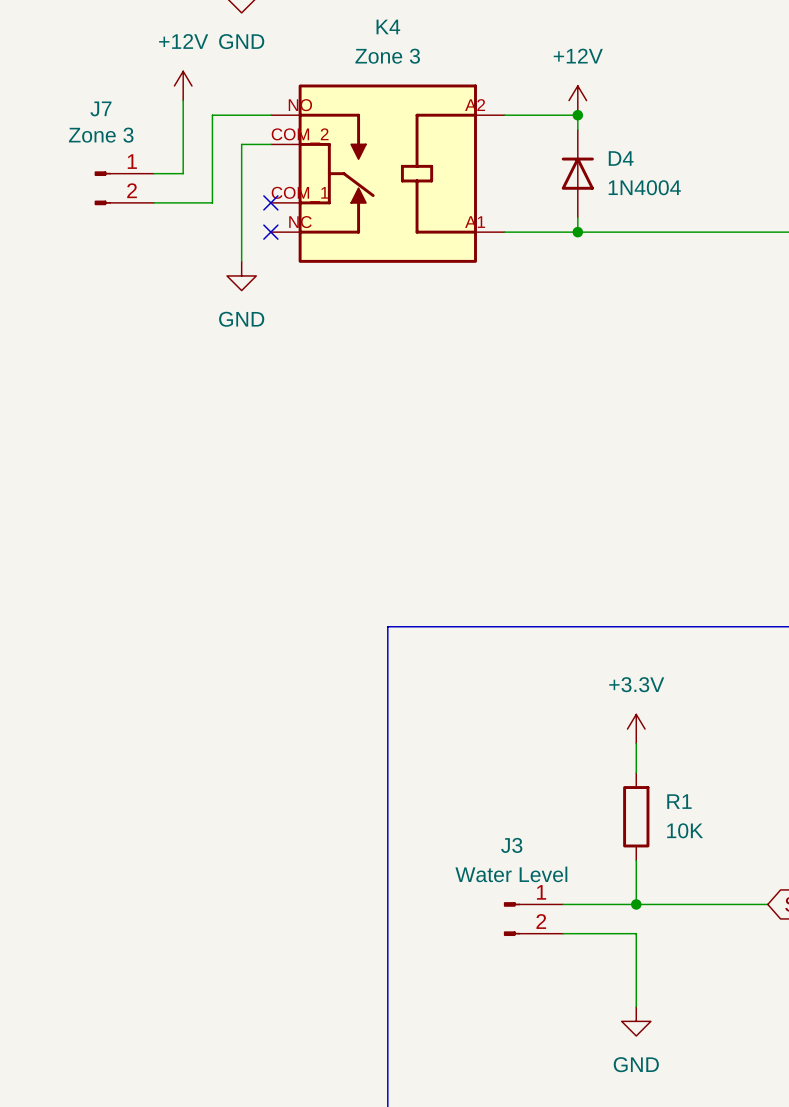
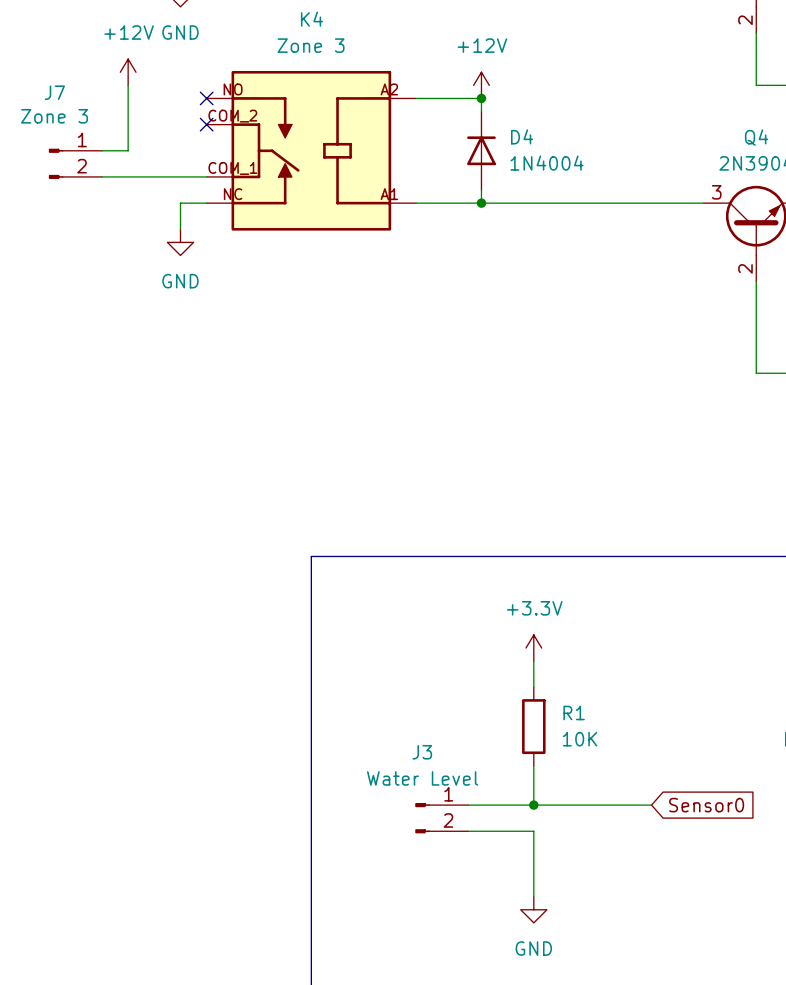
wire: (270, 115) (212, 115) (212, 202) -> (206, 176) (154, 176)
no-connect mark: none -> (206, 98)
wire: (270, 144) (241, 144) (241, 232) -> (206, 203) (180, 203)
no-connect mark: none -> (206, 124)
no-connect mark: (270, 202) -> none
no-connect mark: (270, 232) -> none

